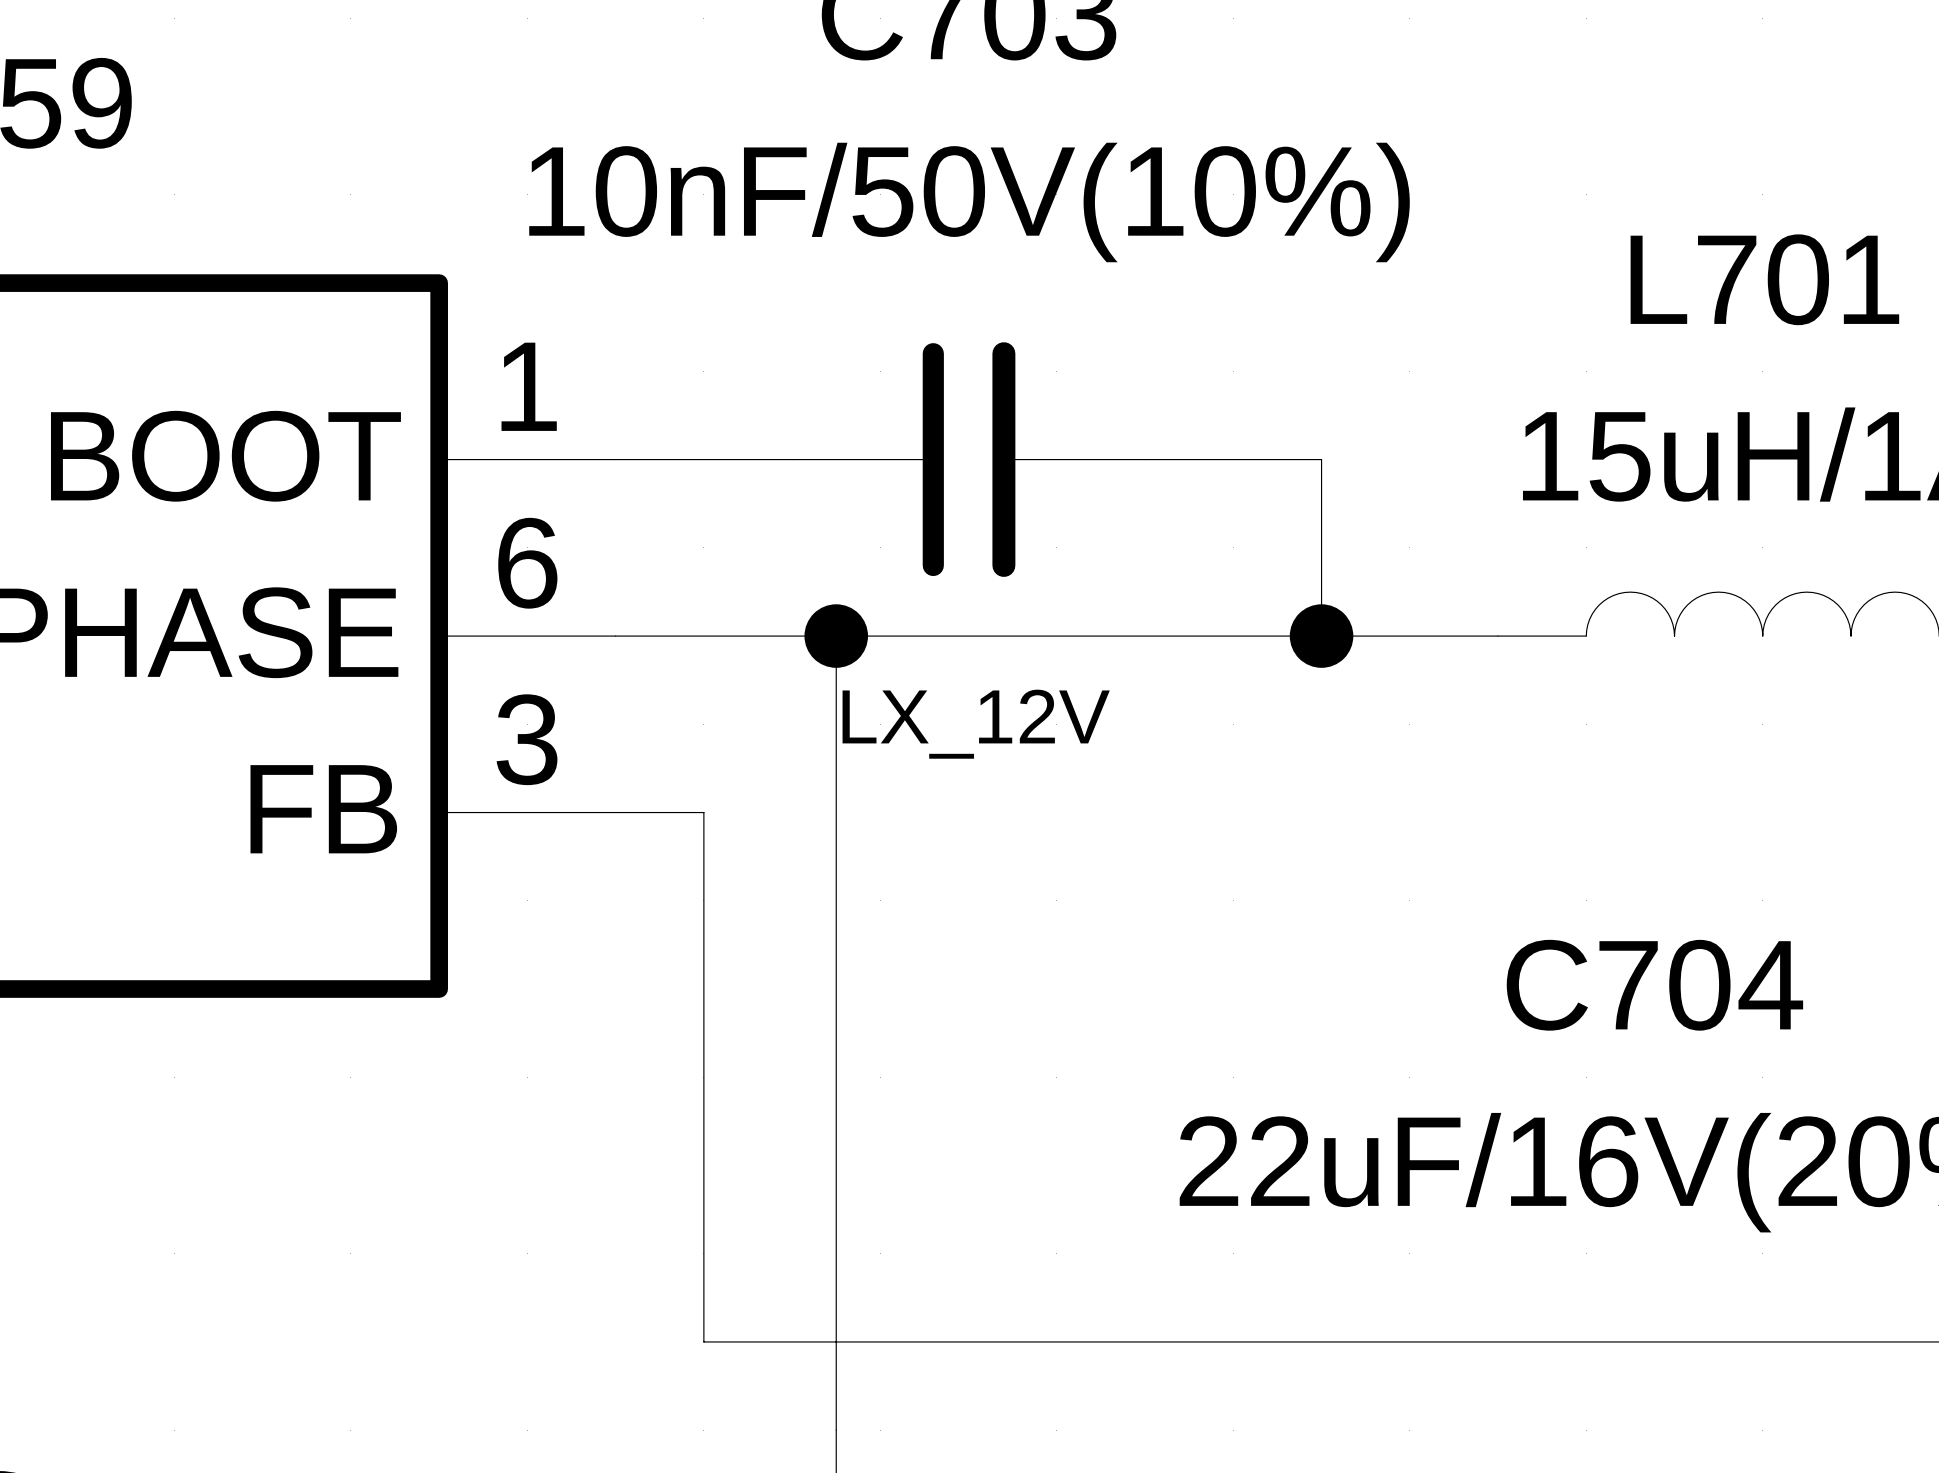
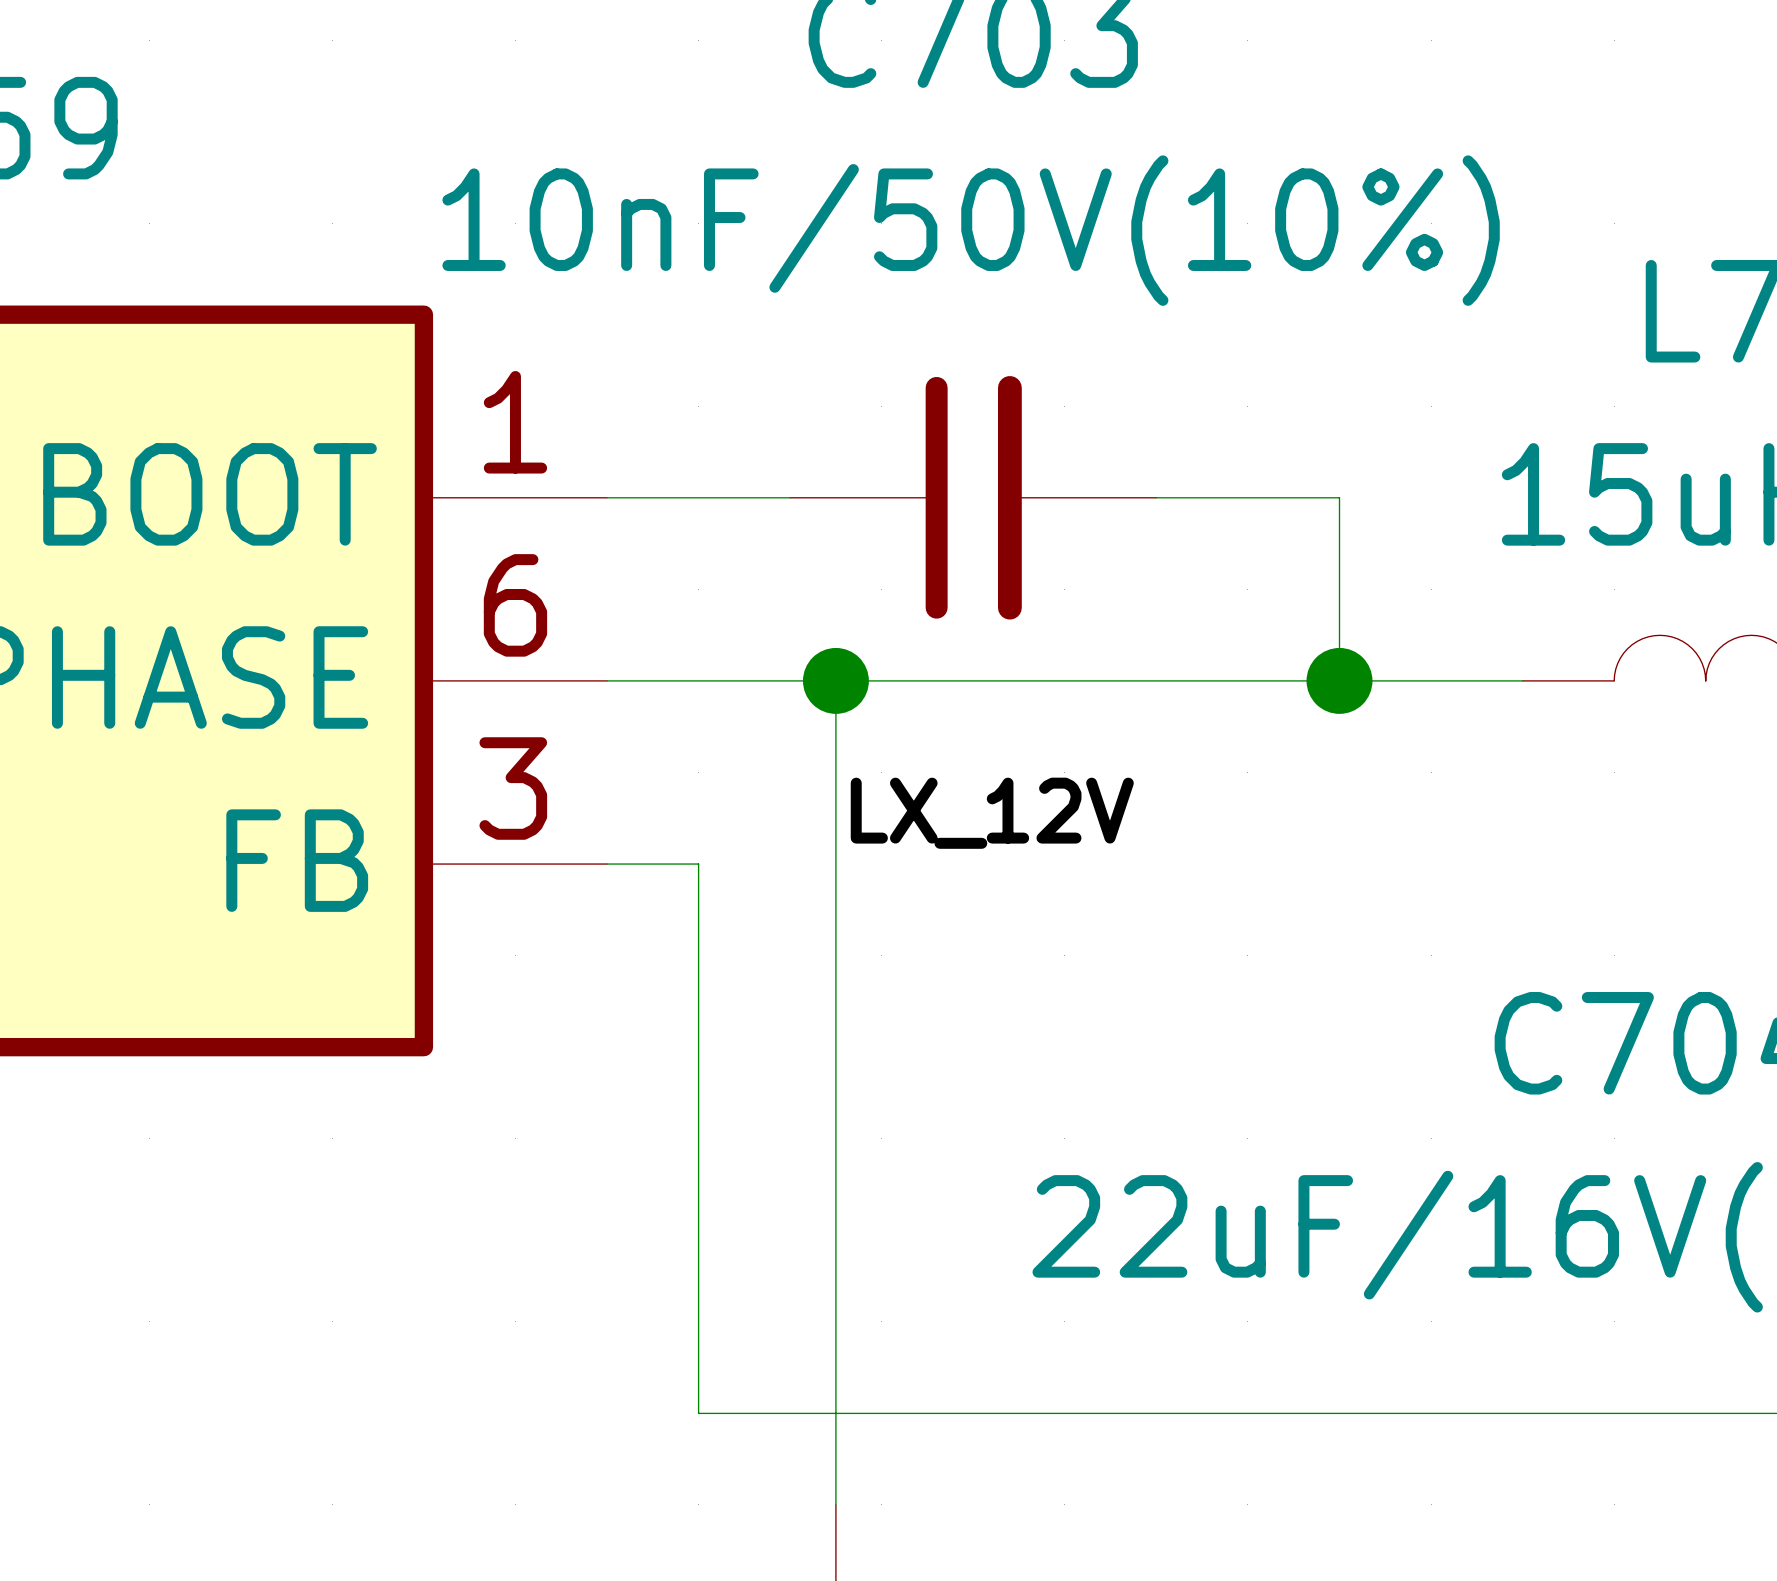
label position: LX_12V (976, 724) -> LX_12V (992, 813)

